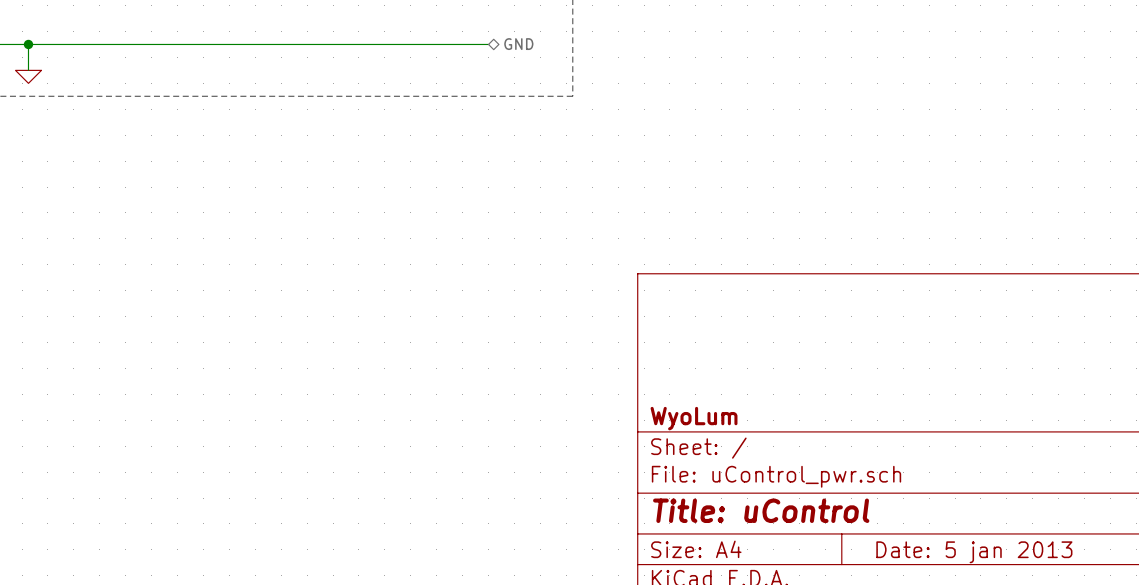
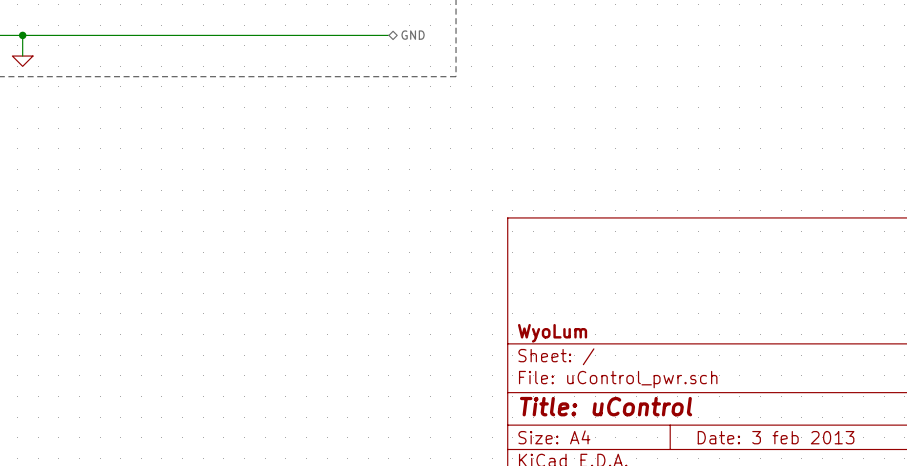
title block: Date: 5 jan 2013 (974, 552) -> Date: 3 feb 2013 (776, 437)

